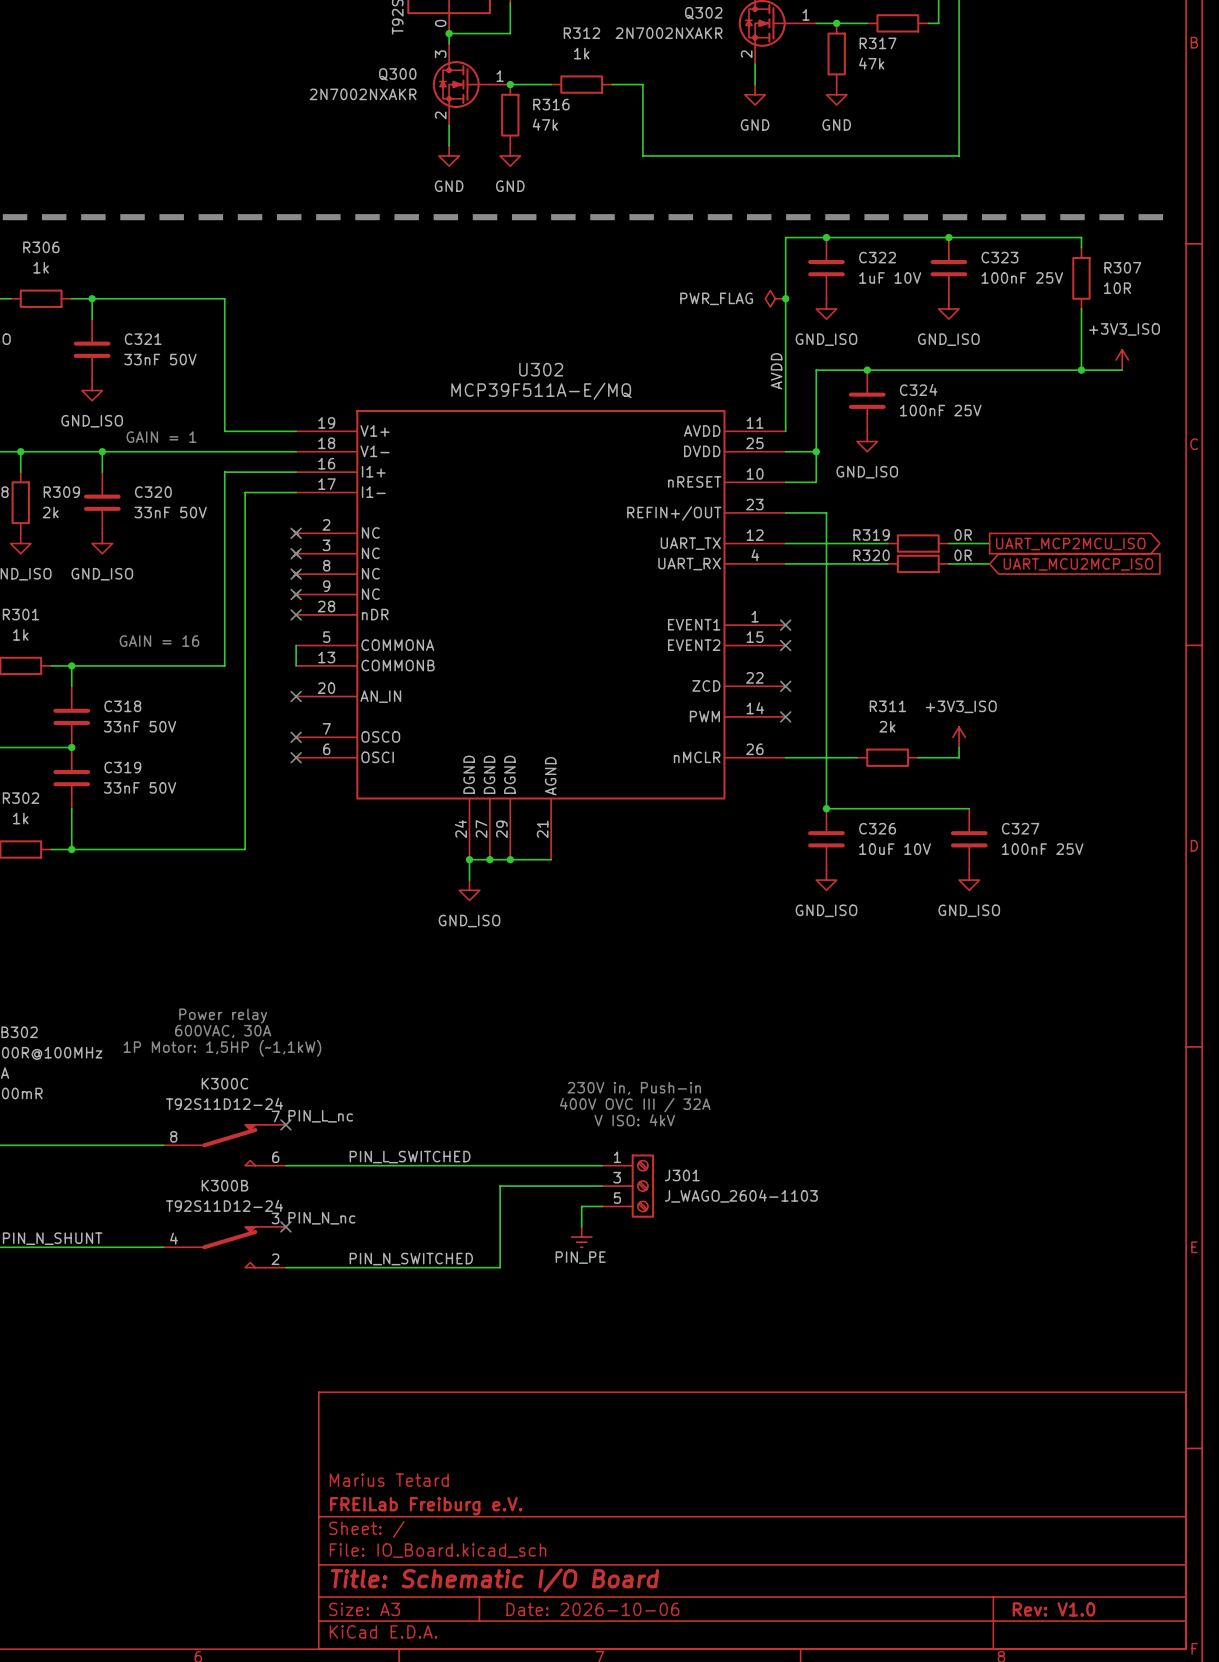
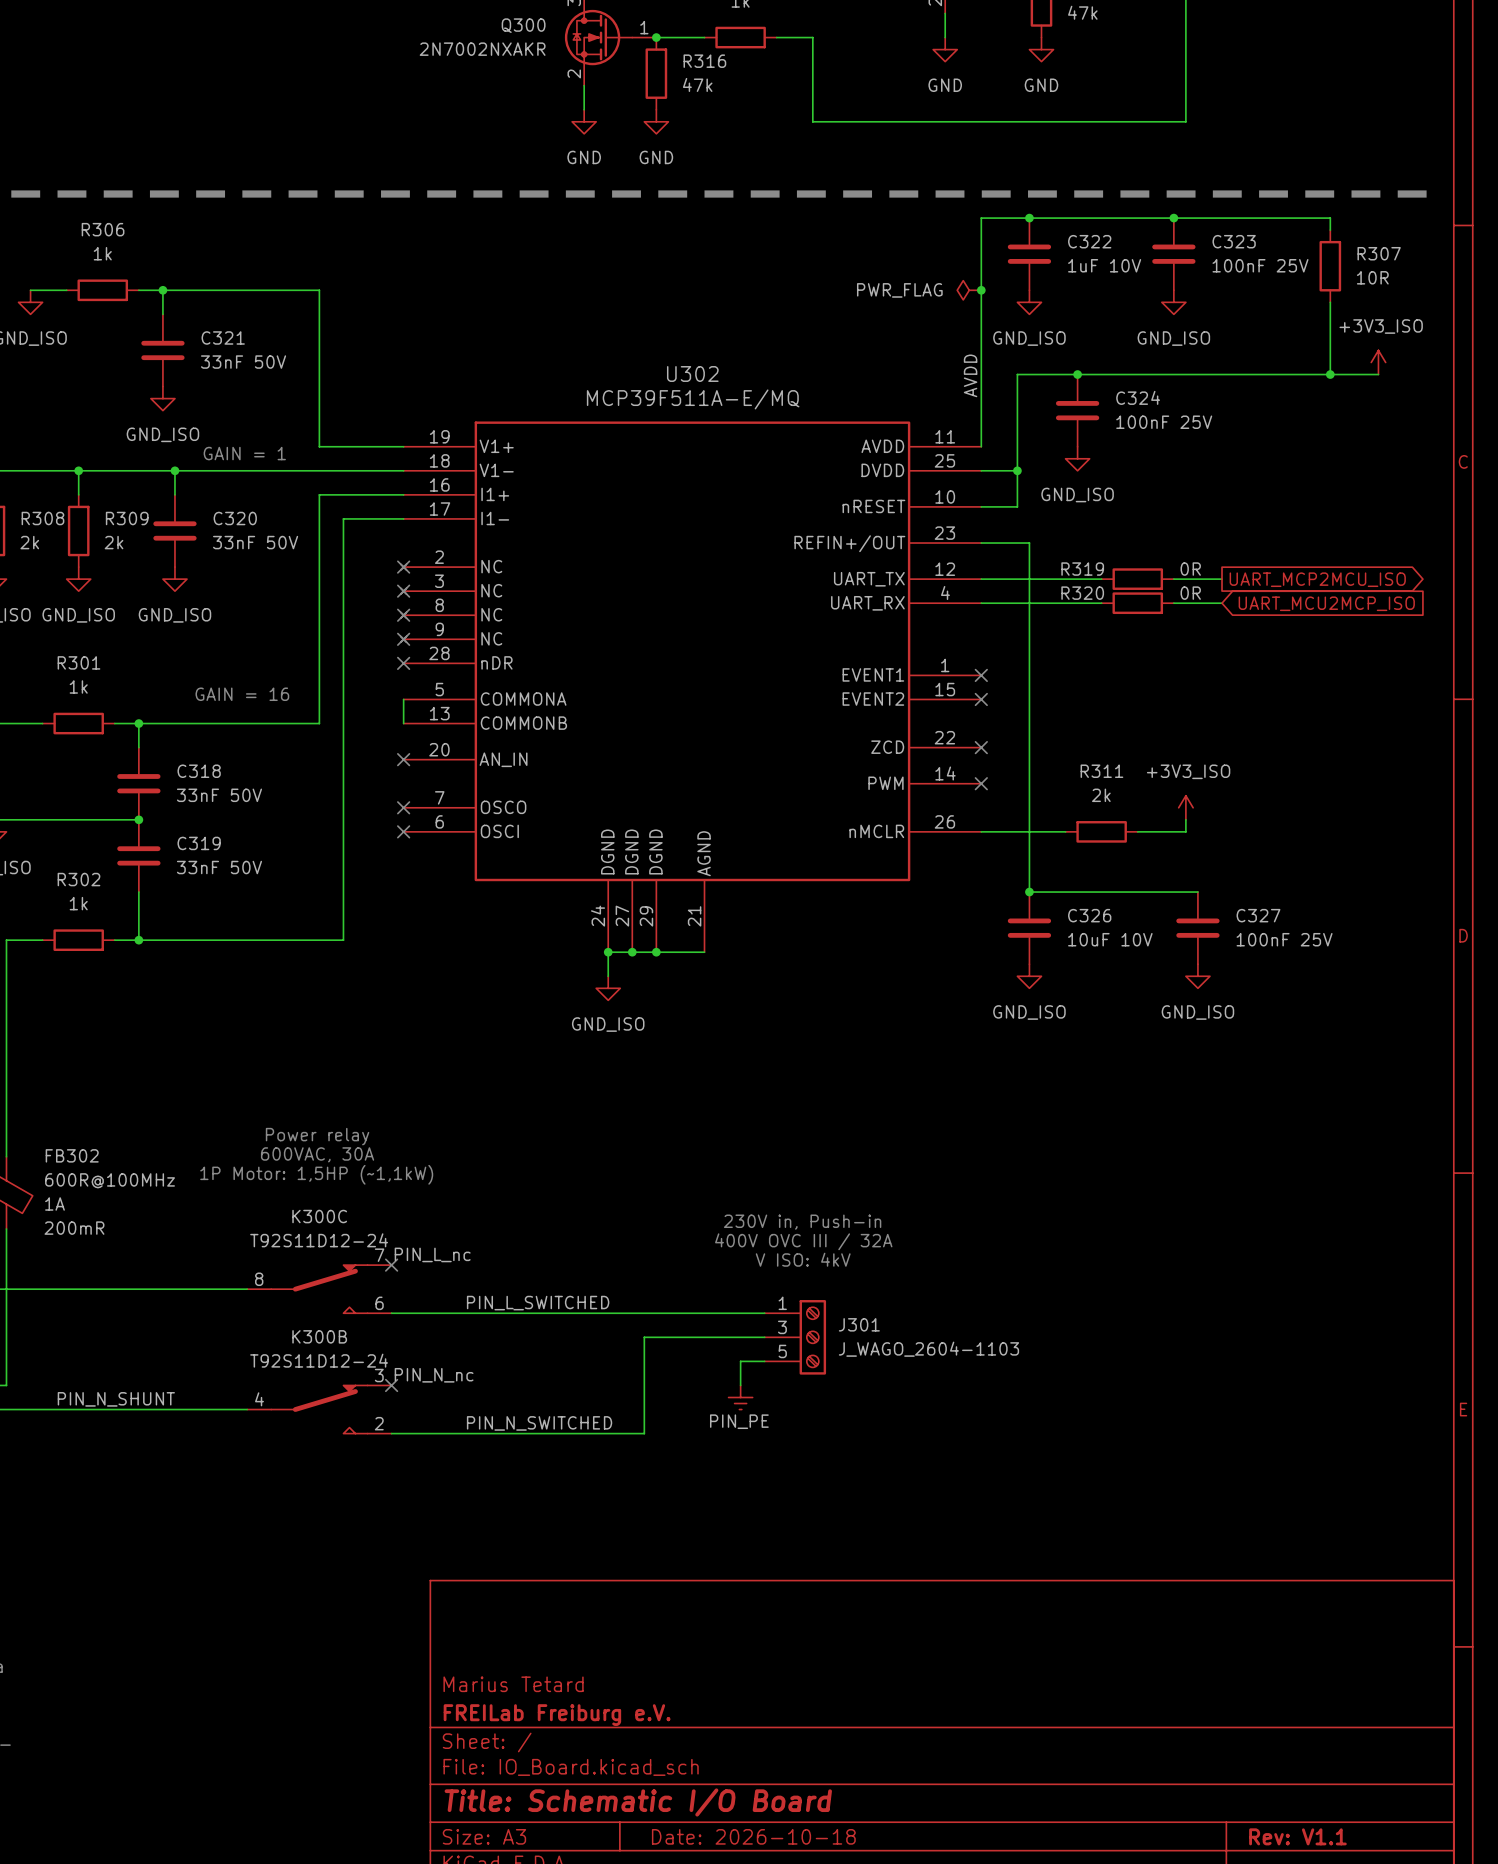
title block: Date: 2026-10-06 (592, 1609) -> Date: 2026-10-18 (753, 1836)
title block: Rev: V1.0 (1054, 1609) -> Rev: V1.1 (1297, 1836)

